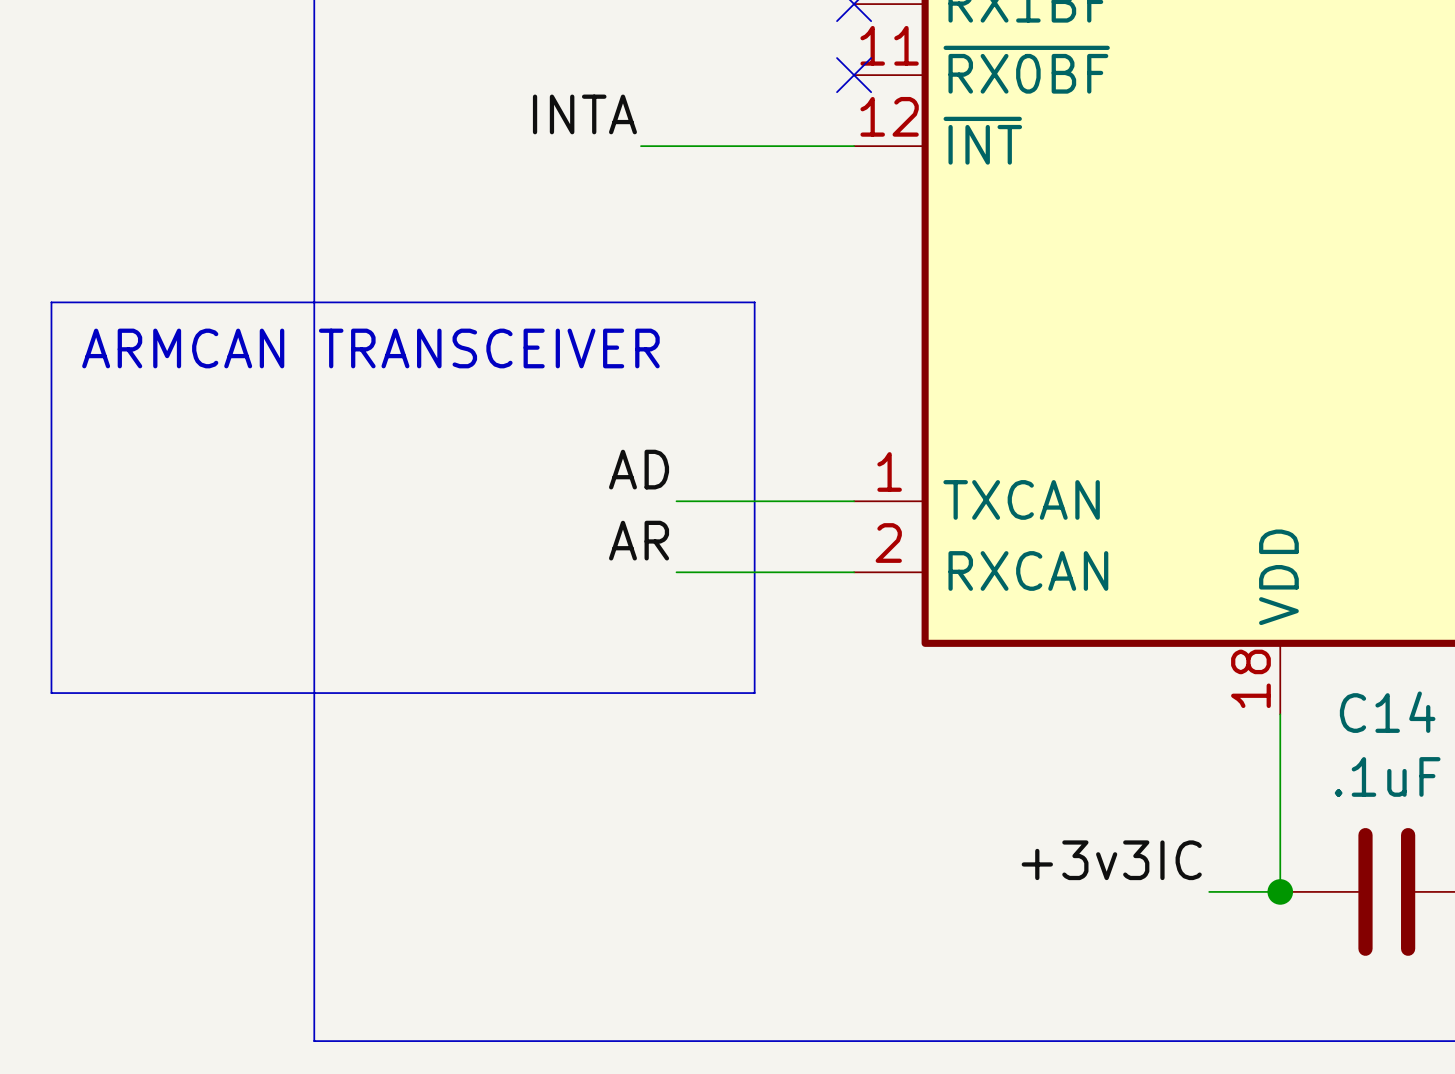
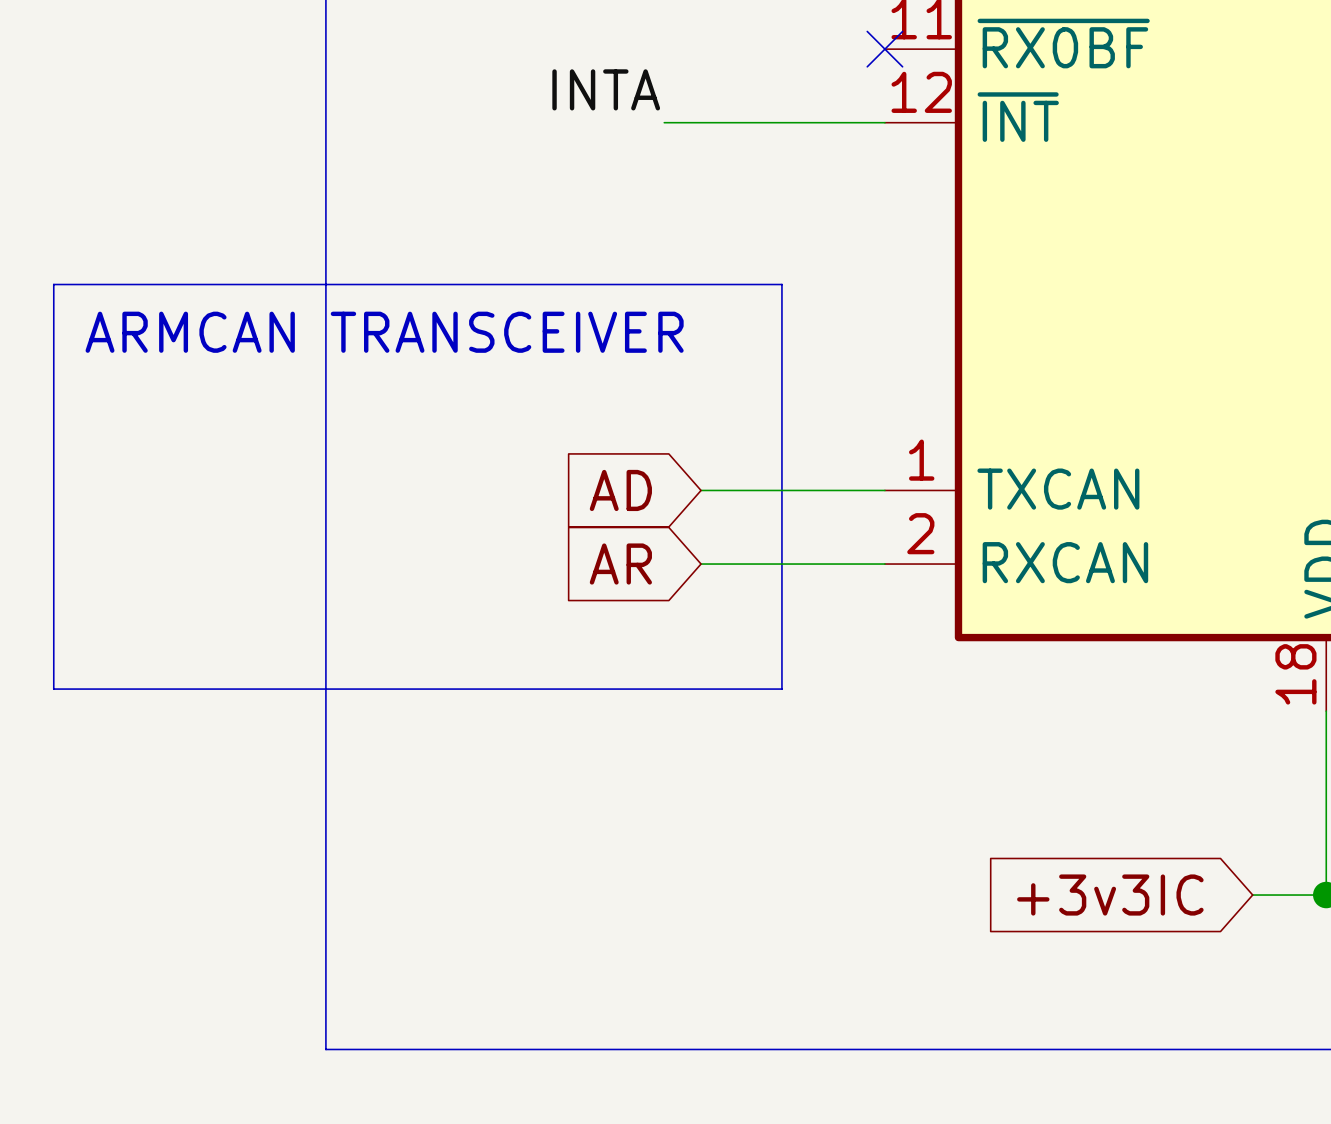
label: AD (639, 469) -> none
global label: none -> AD (620, 490)
label: AR (639, 540) -> none
global label: none -> AR (620, 564)
label: +3v3IC (1111, 860) -> none
global label: none -> +3v3IC (1110, 895)

